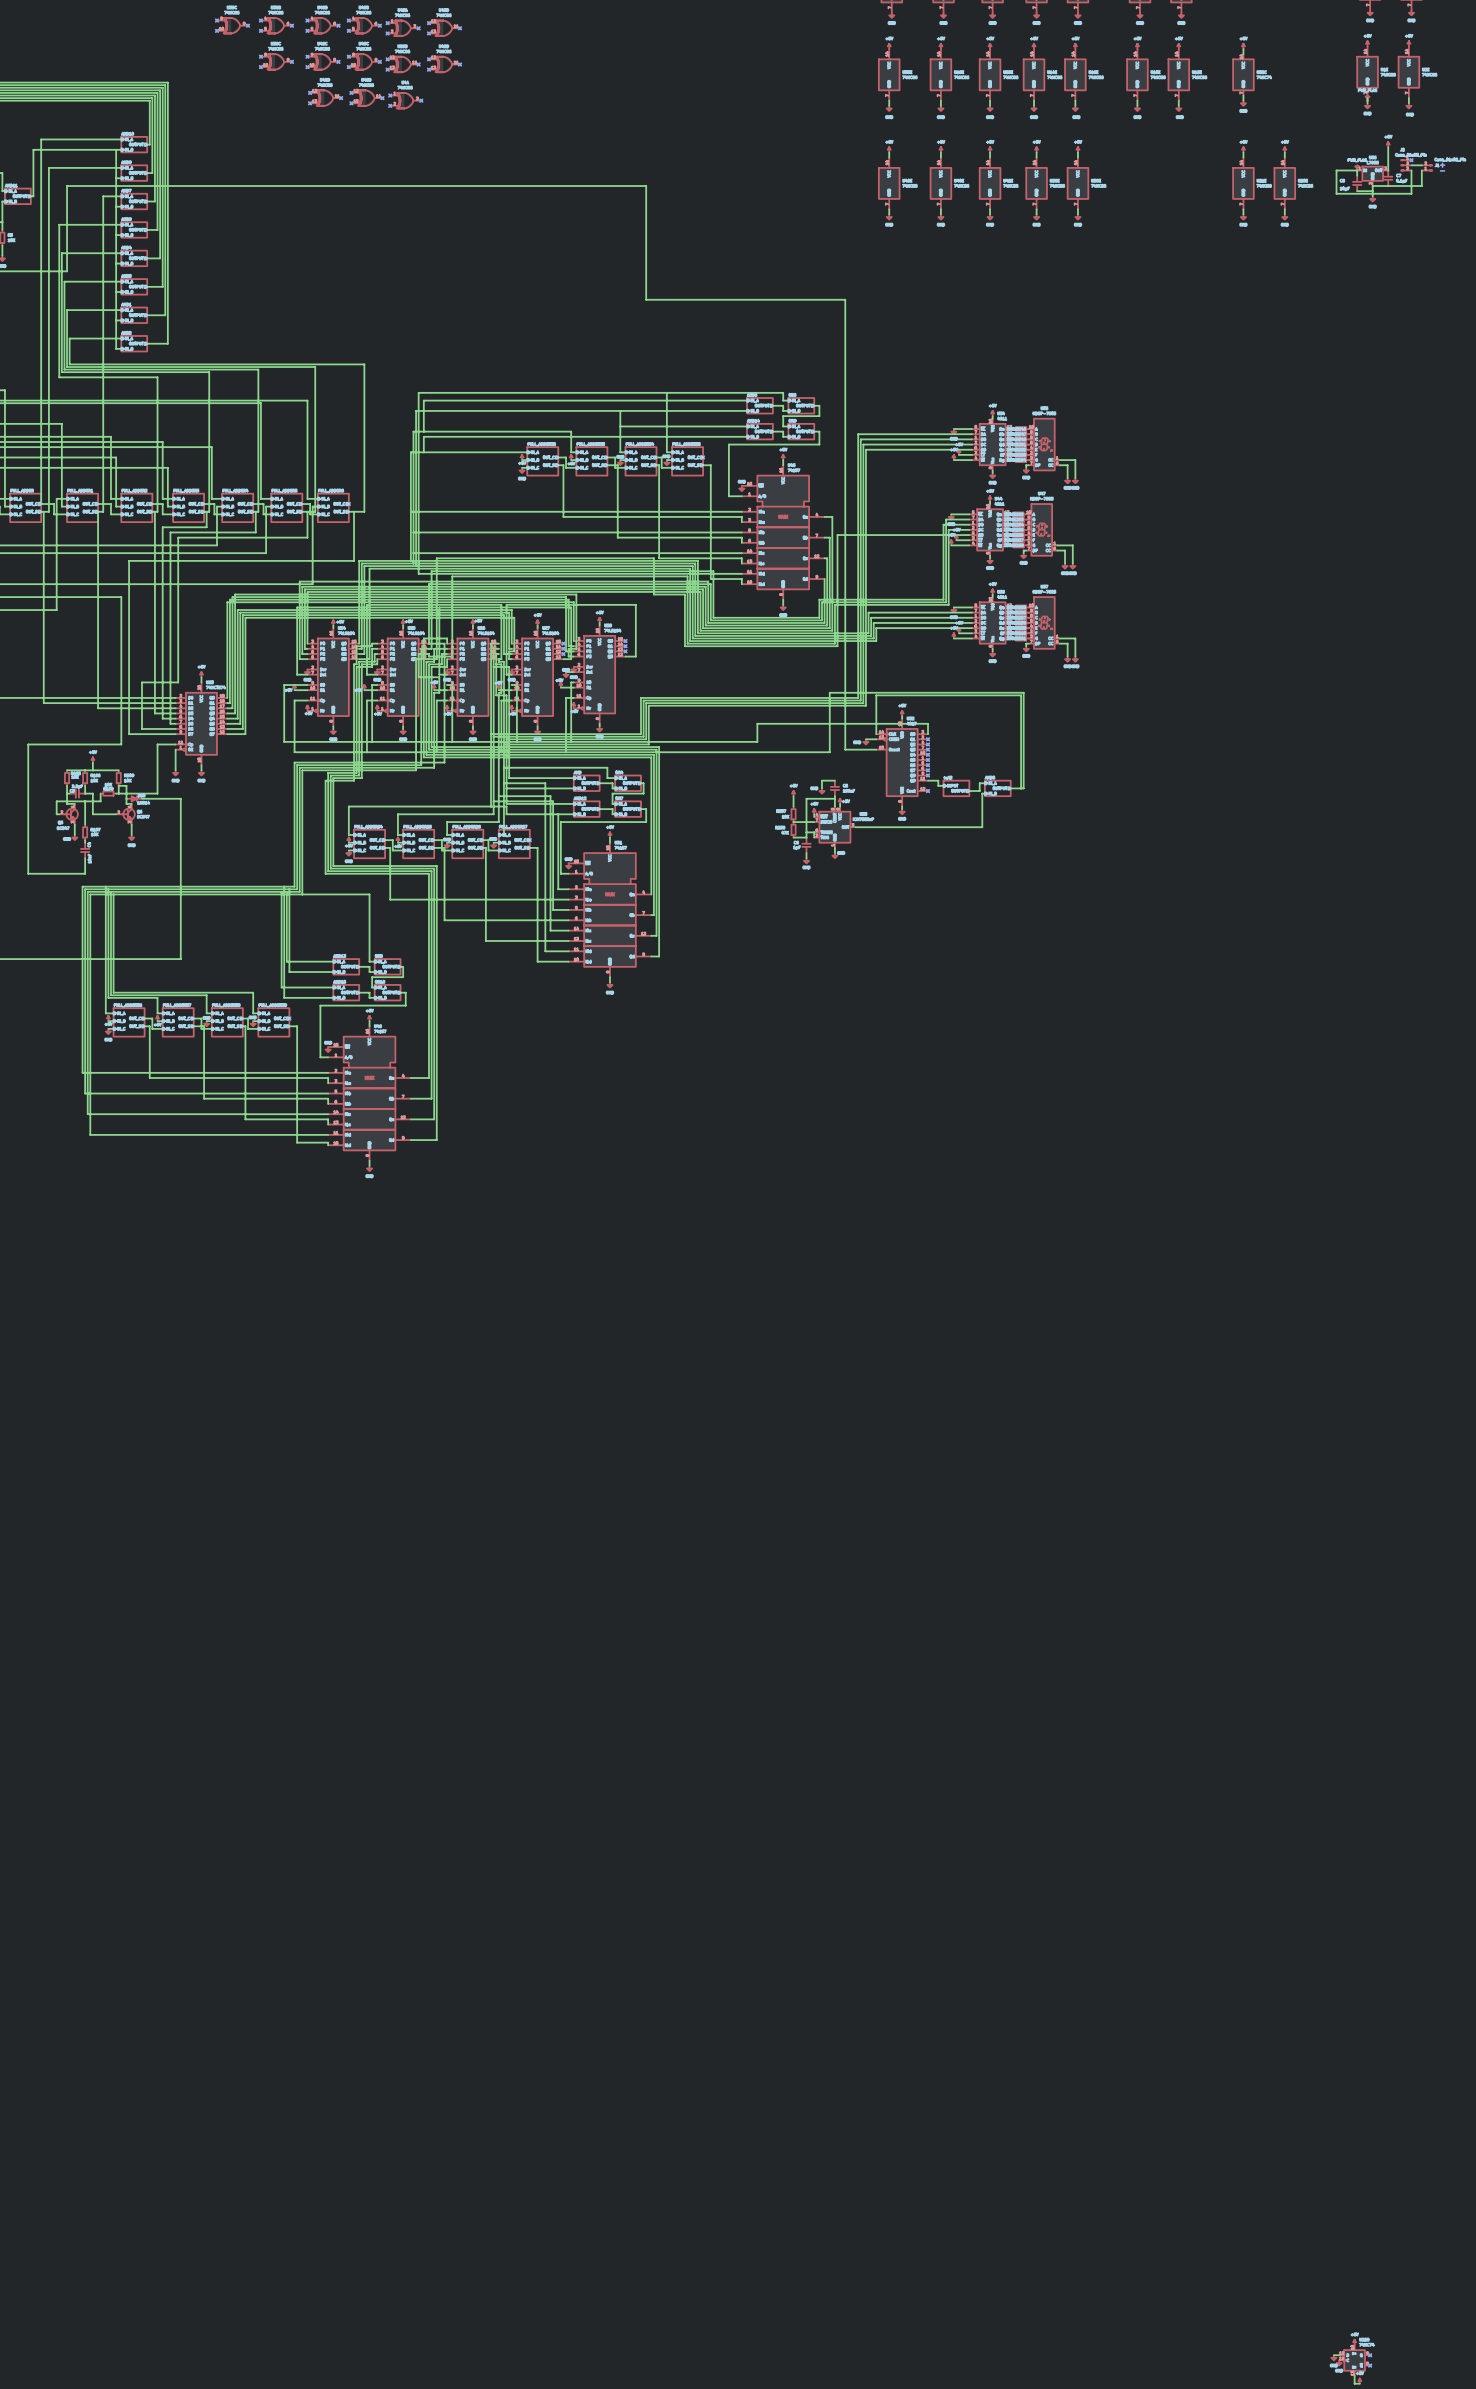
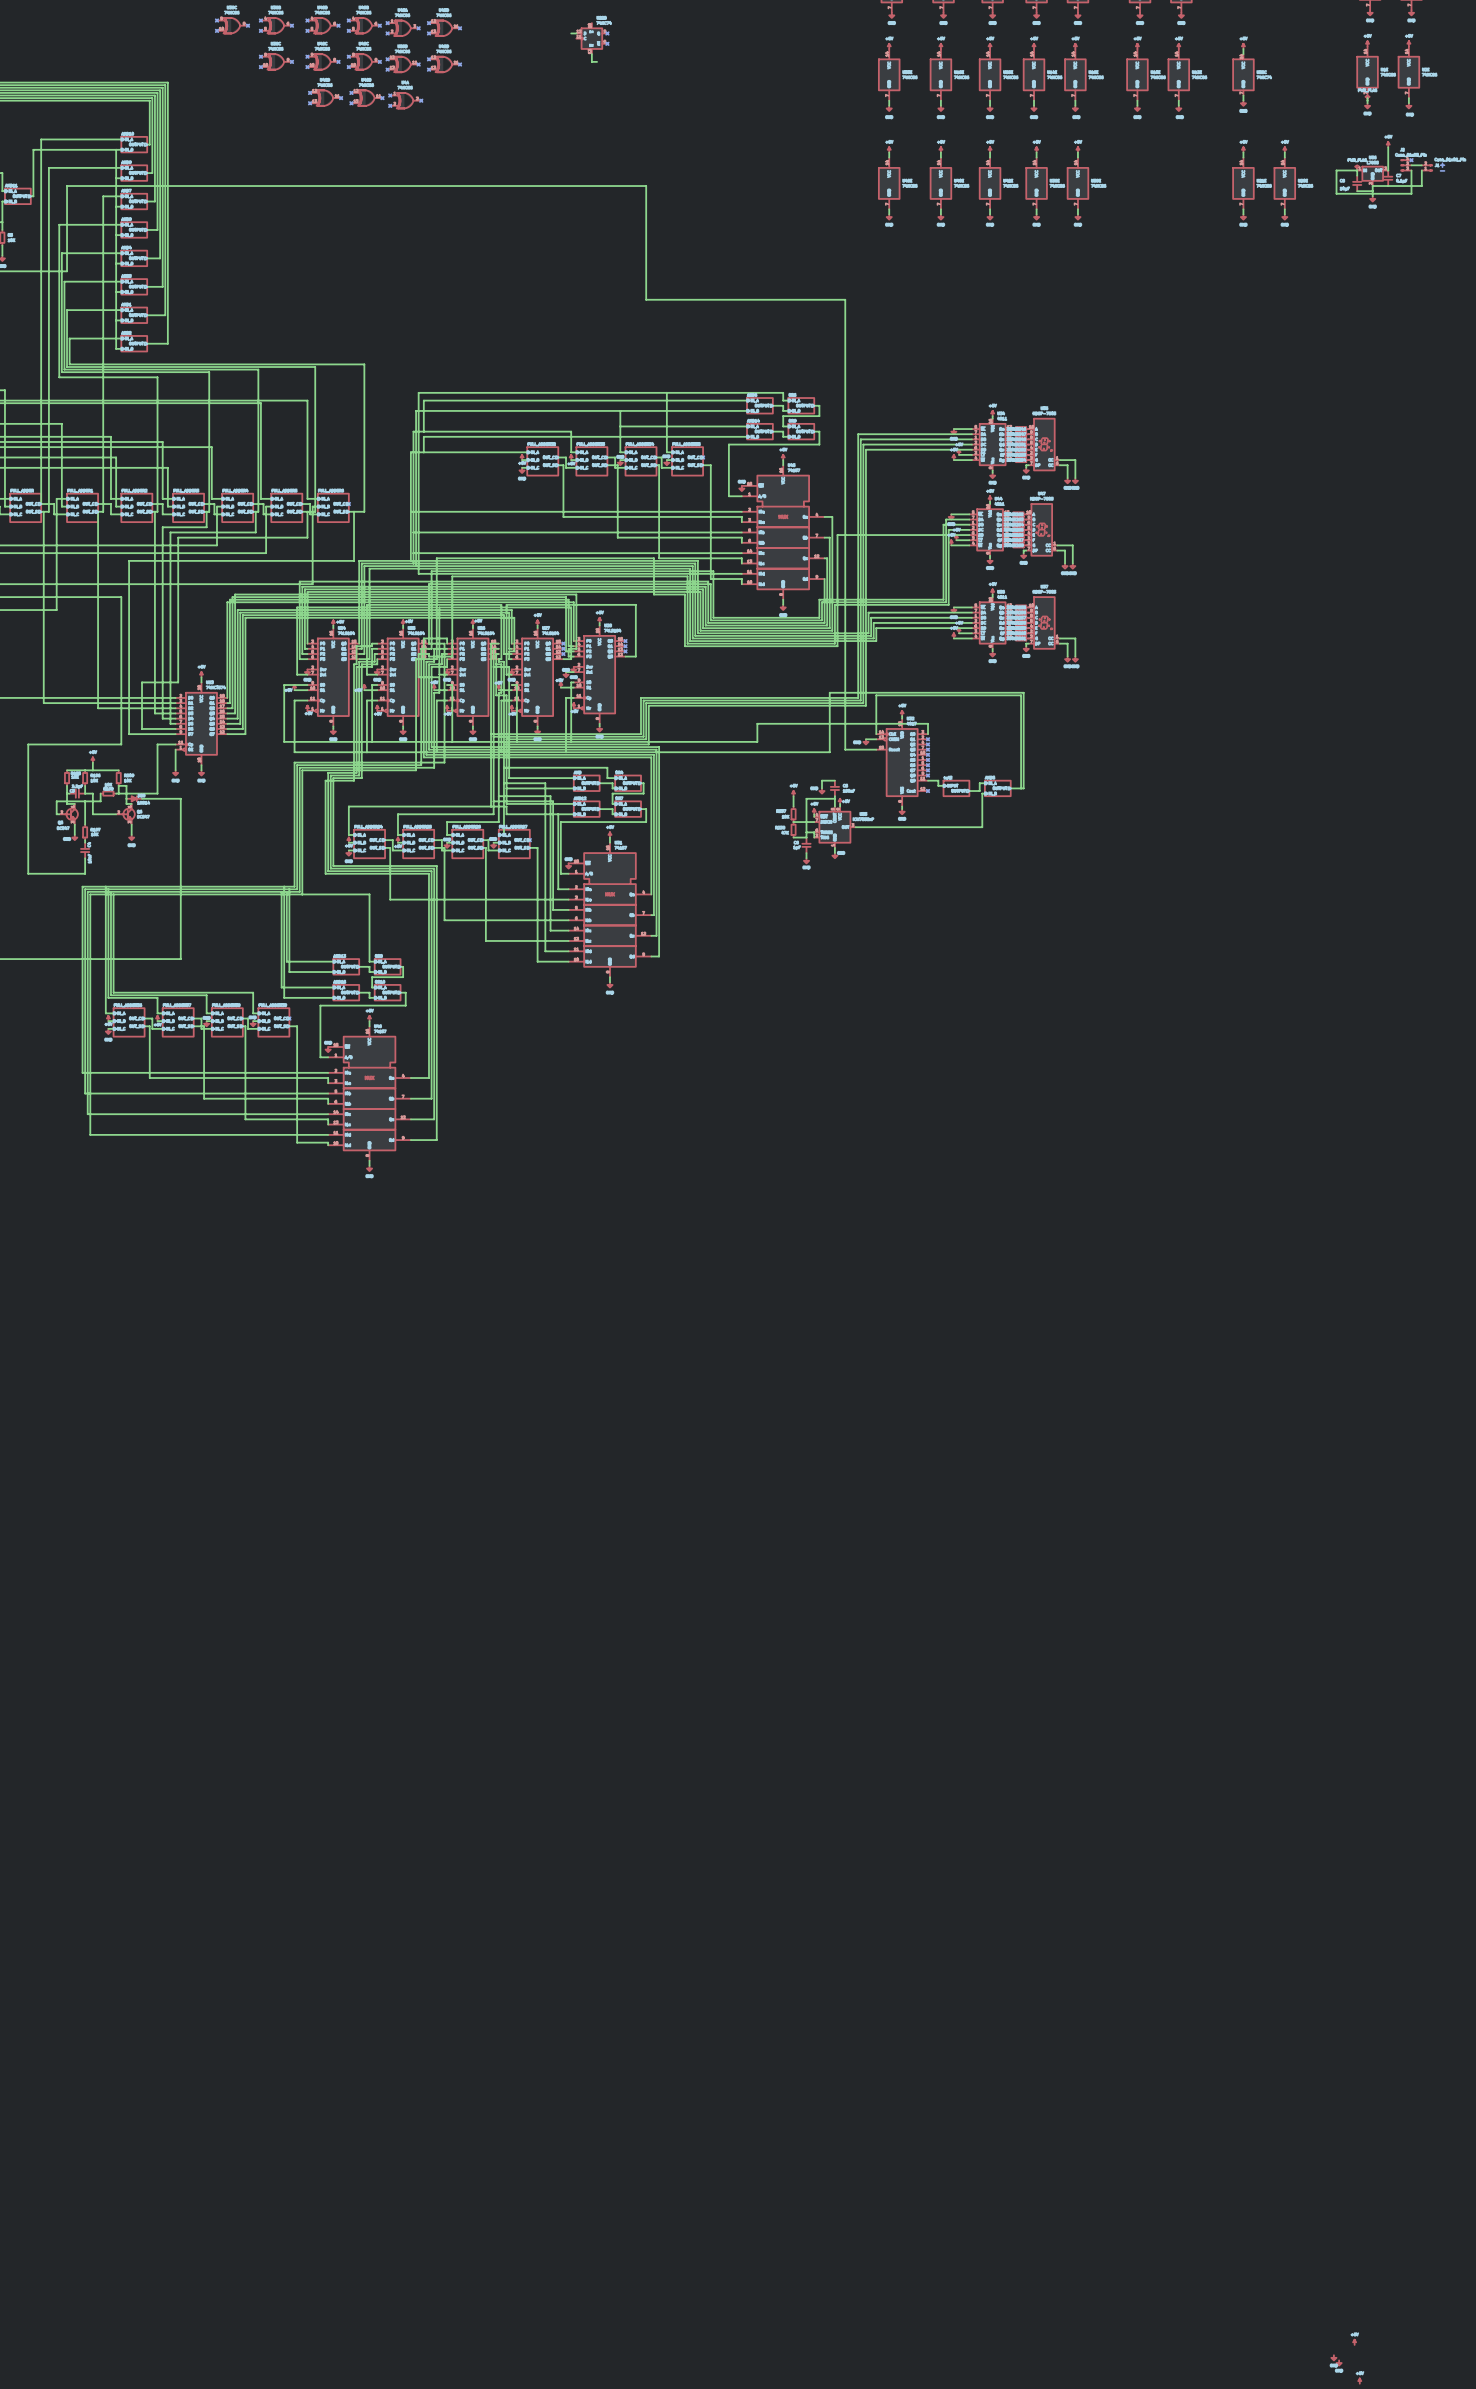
wire: none -> (571, 33) (576, 33)
no-connect mark: none -> (607, 33)
no-connect mark: none -> (607, 43)
wire: none -> (591, 54) (591, 61) (597, 61)
wire: (1333, 2355) (1339, 2355) -> none
no-connect mark: (1370, 2355) -> none
part position: (1354, 2360) -> (591, 38)
no-connect mark: (1370, 2365) -> none
wire: (1354, 2375) (1354, 2383) (1359, 2383) -> none

